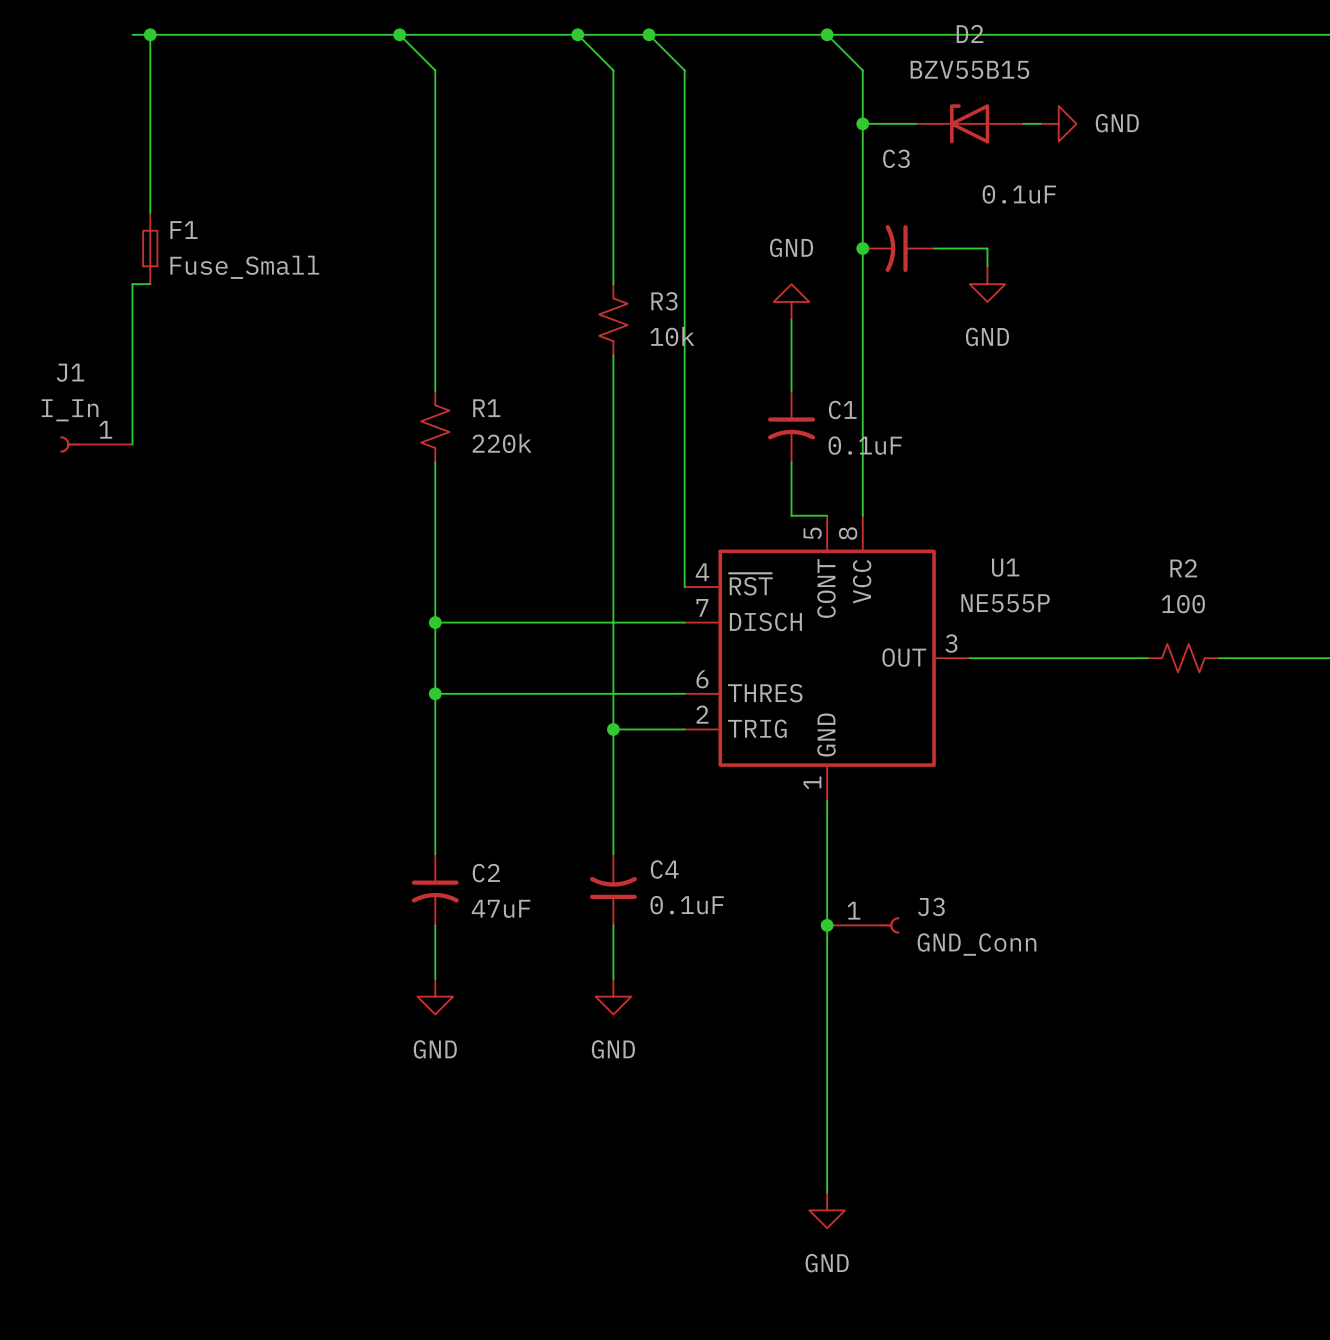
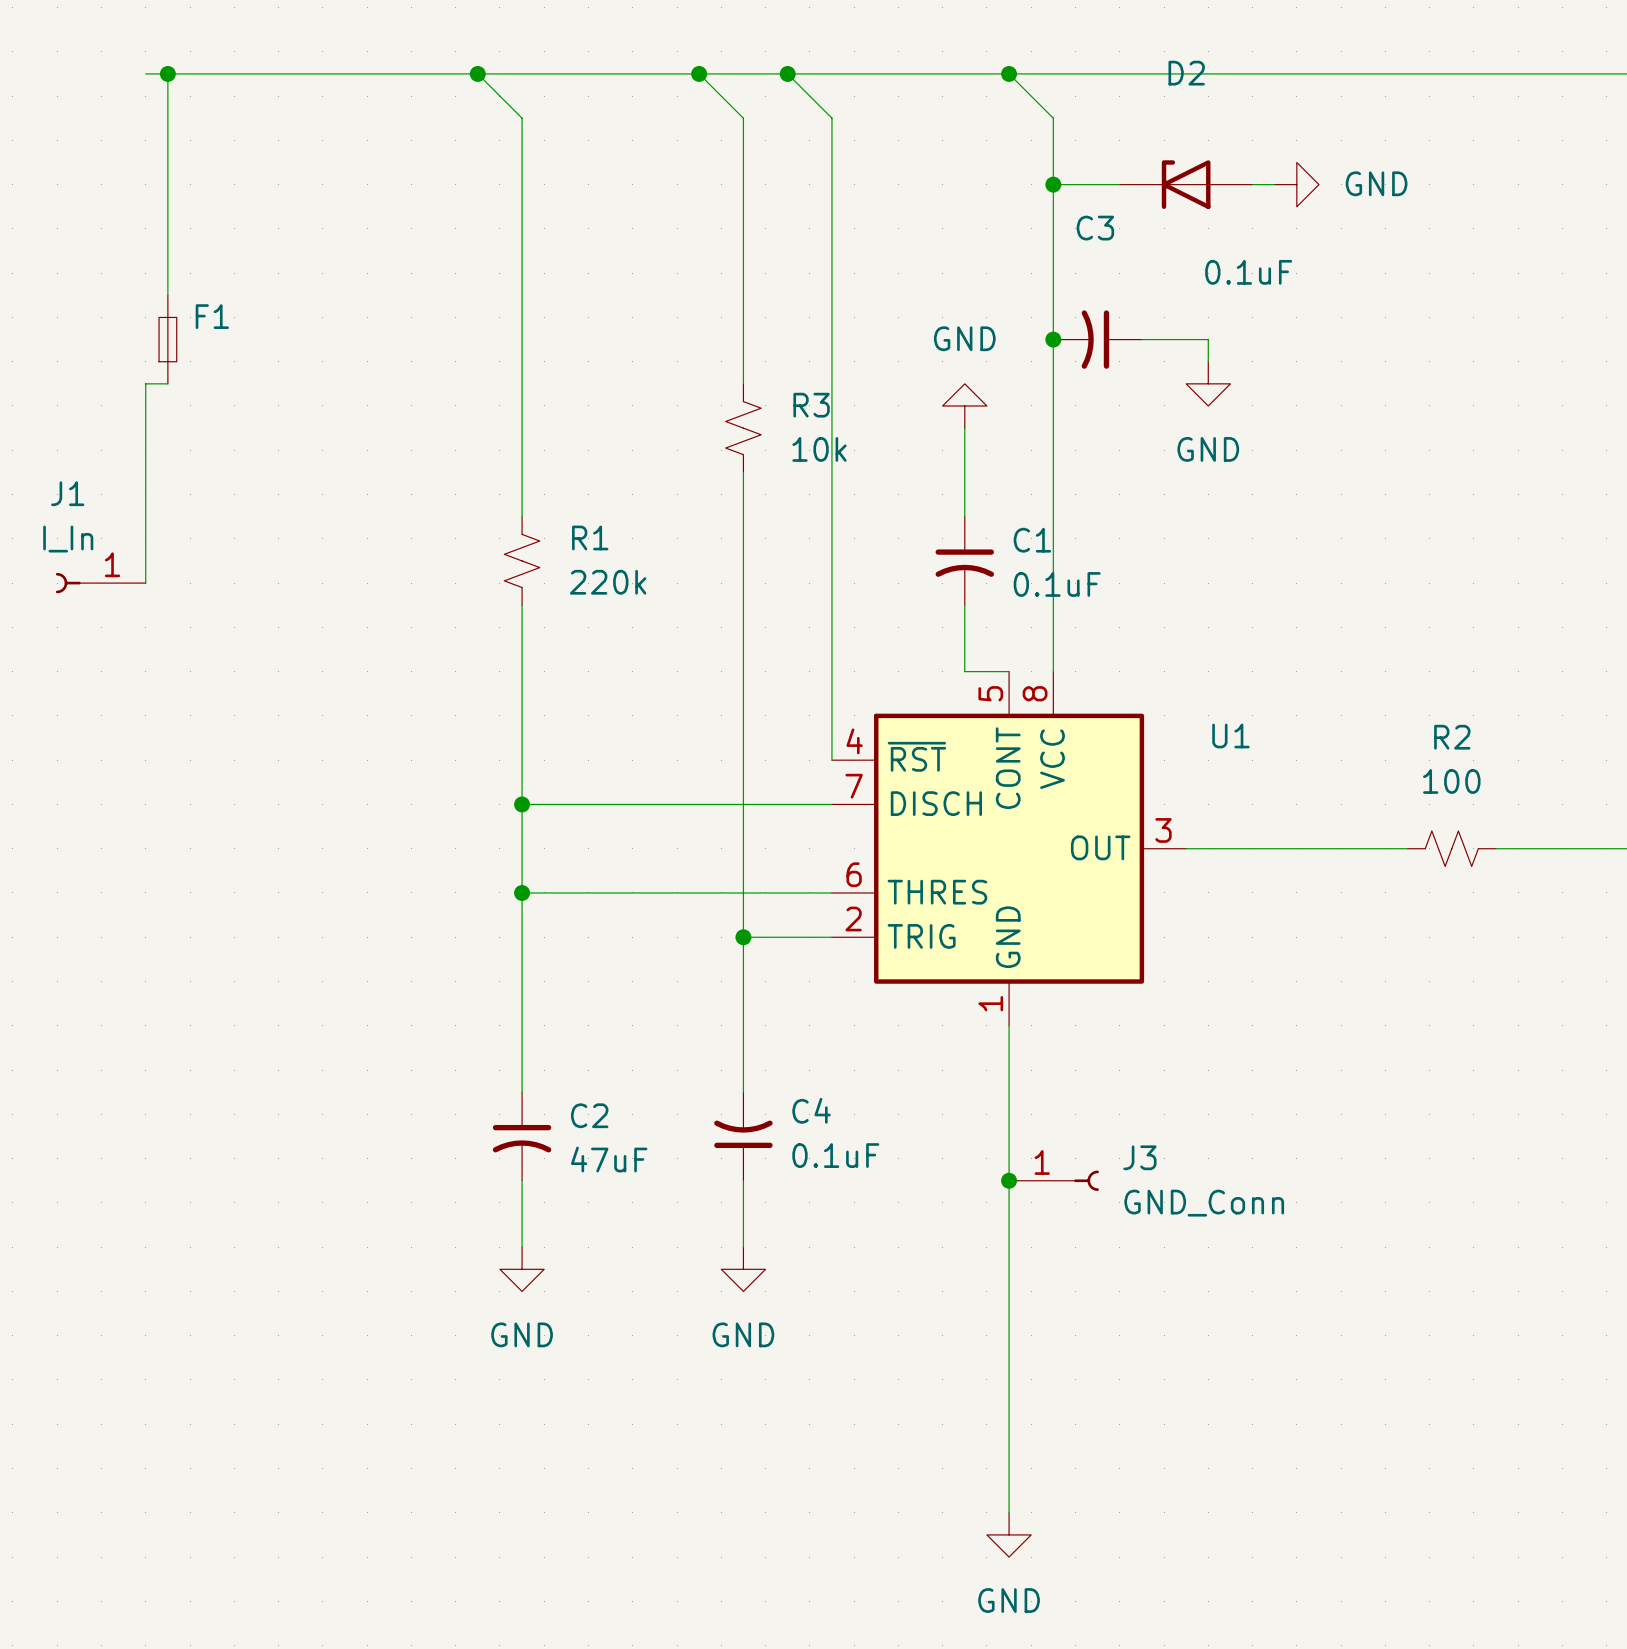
D2 value: BZV55B15 (969, 69) -> none
F1 value: Fuse_Small (244, 267) -> none
U1 value: NE555P (1005, 603) -> none

